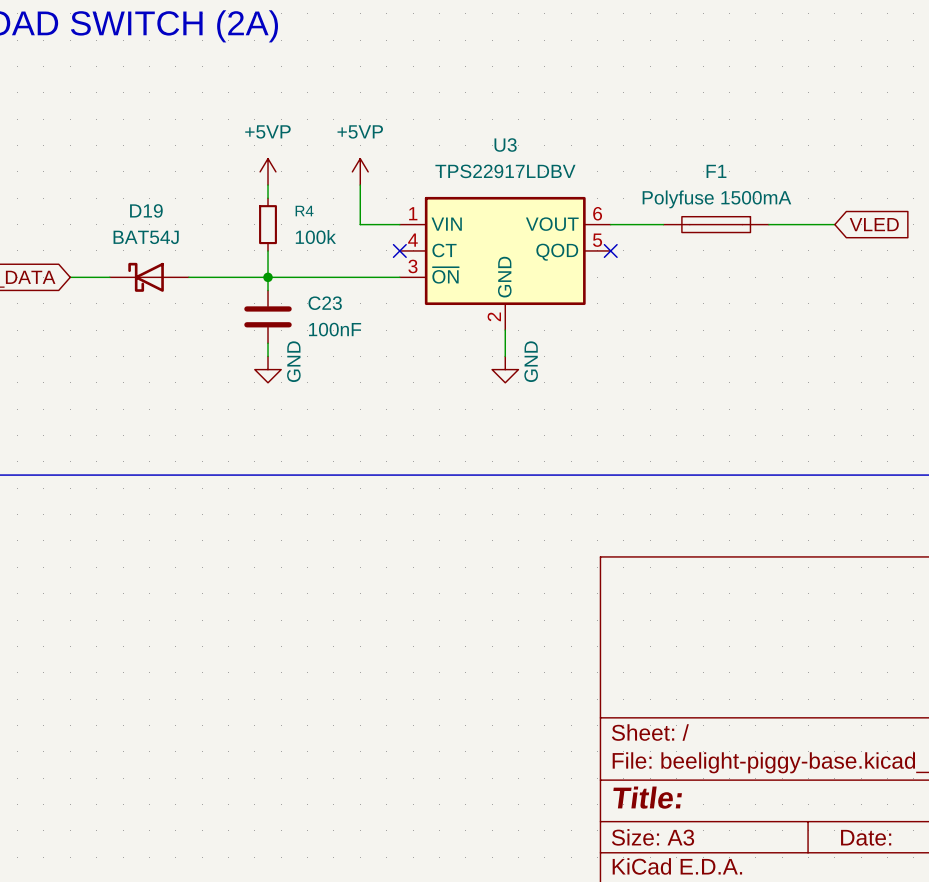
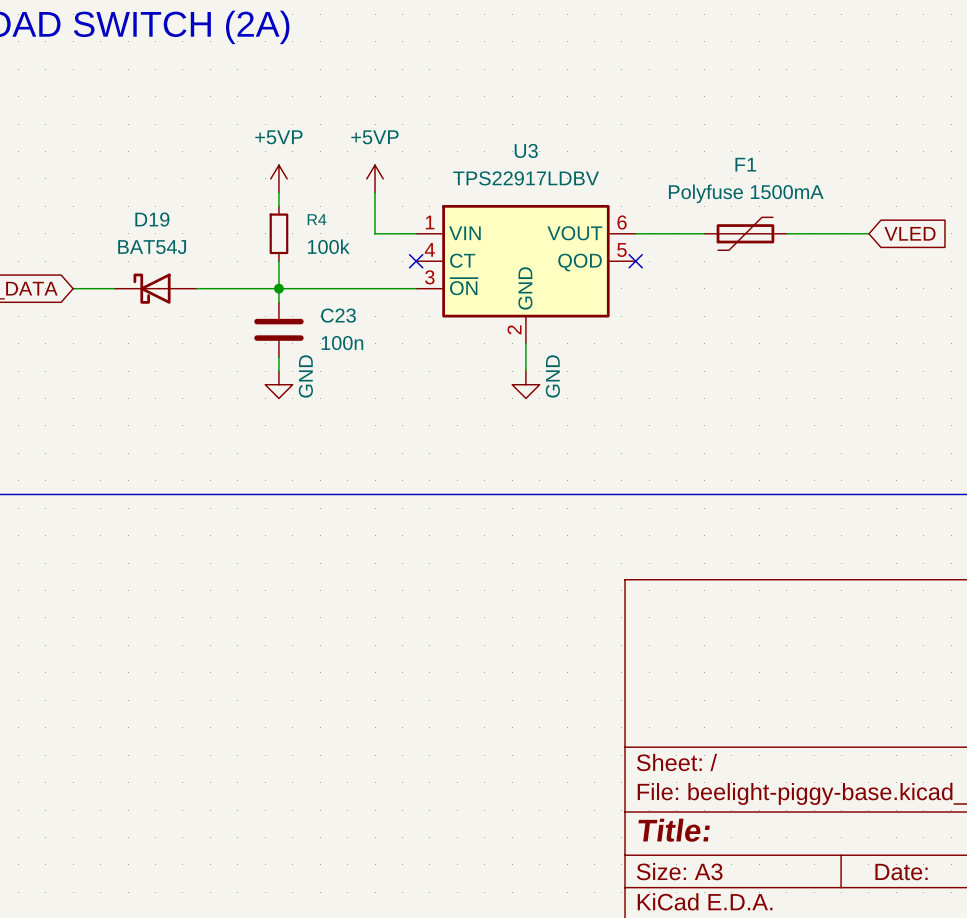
F1 symbol: [663, 216, 769, 233] -> [704, 217, 787, 251]
C23 value: 100nF (335, 329) -> 100n (342, 343)

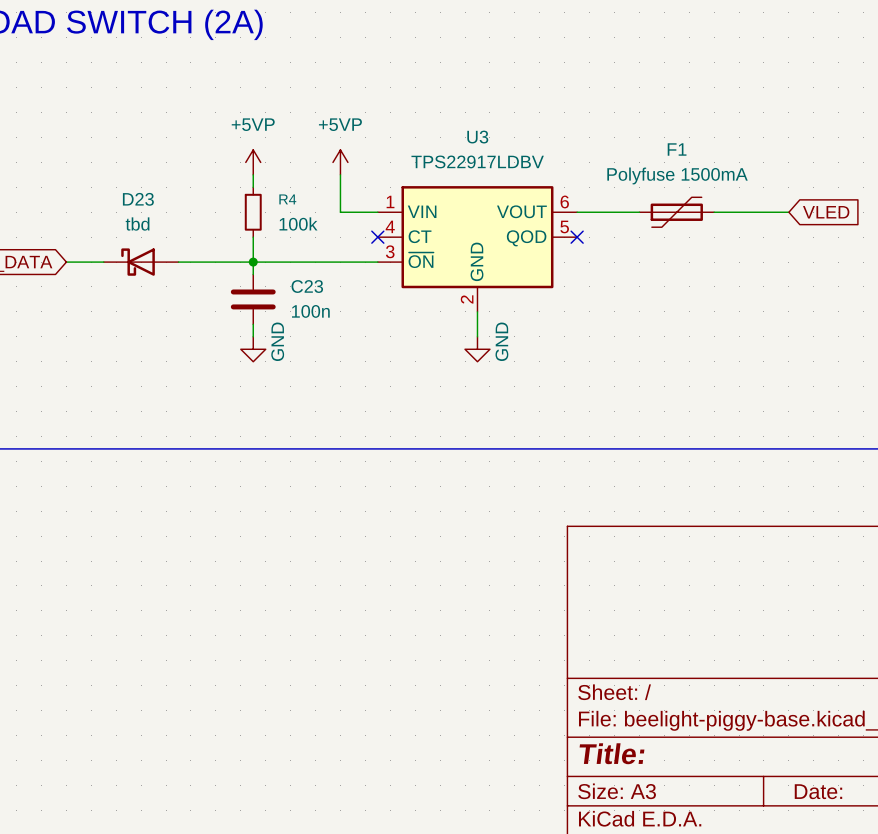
D19 name: D19 (152, 219) -> D23 (138, 199)
D19 value: BAT54J (152, 247) -> tbd (137, 224)

